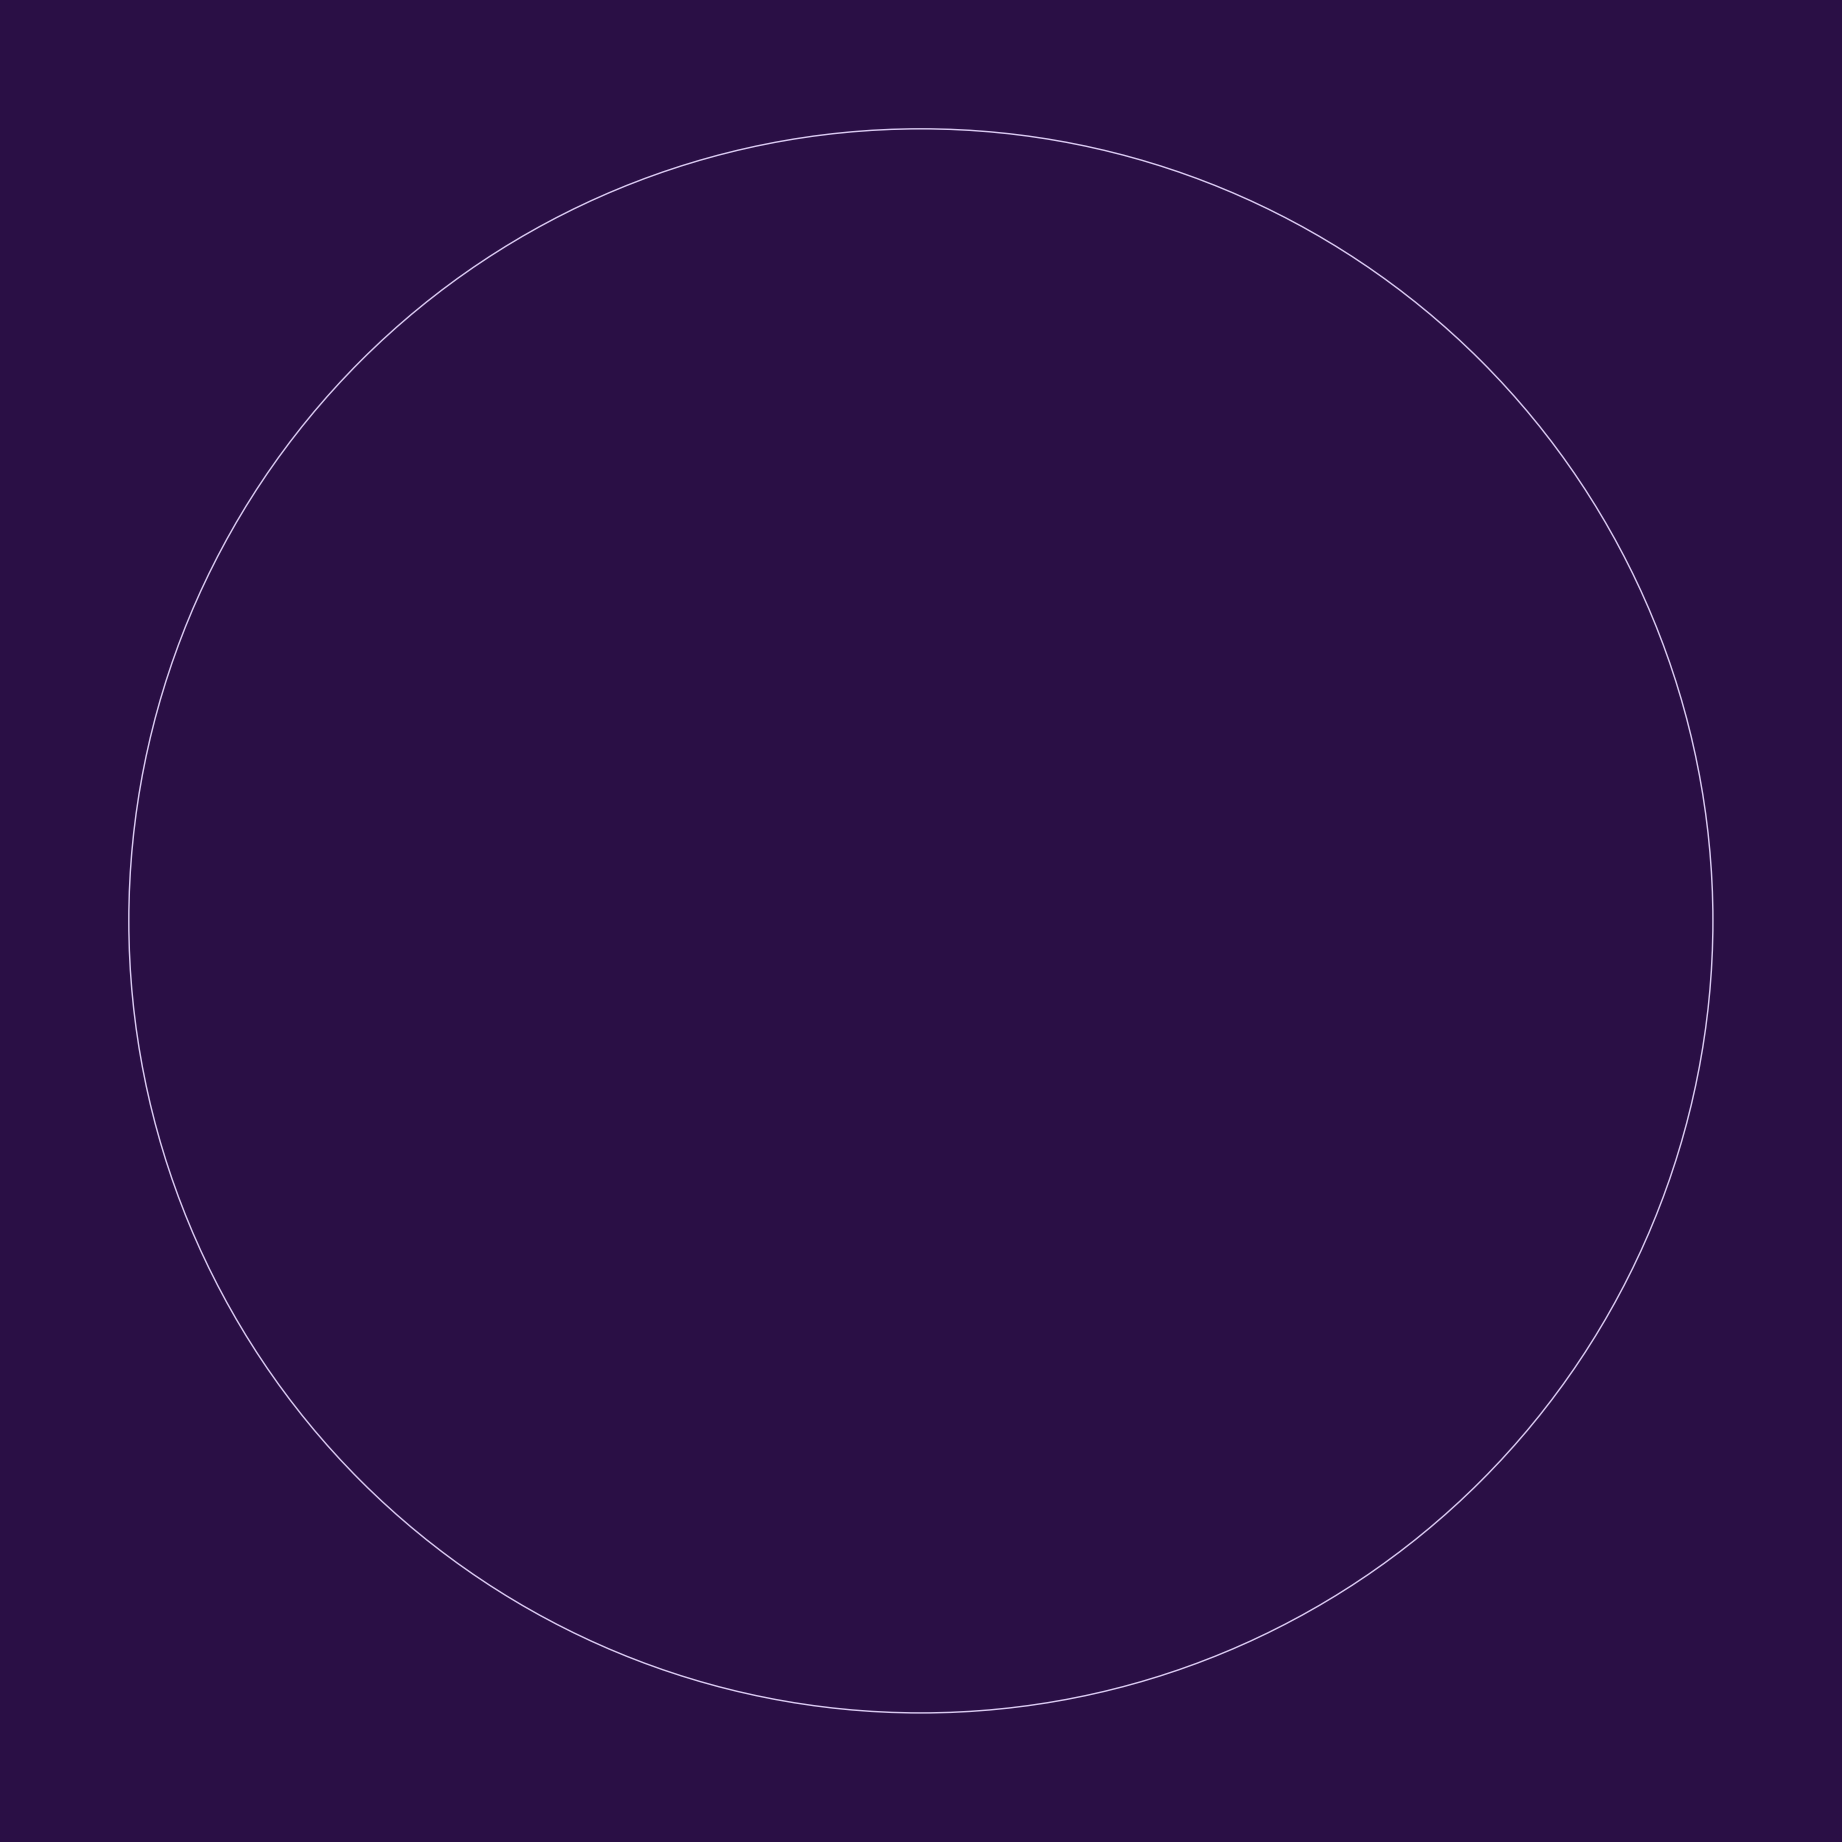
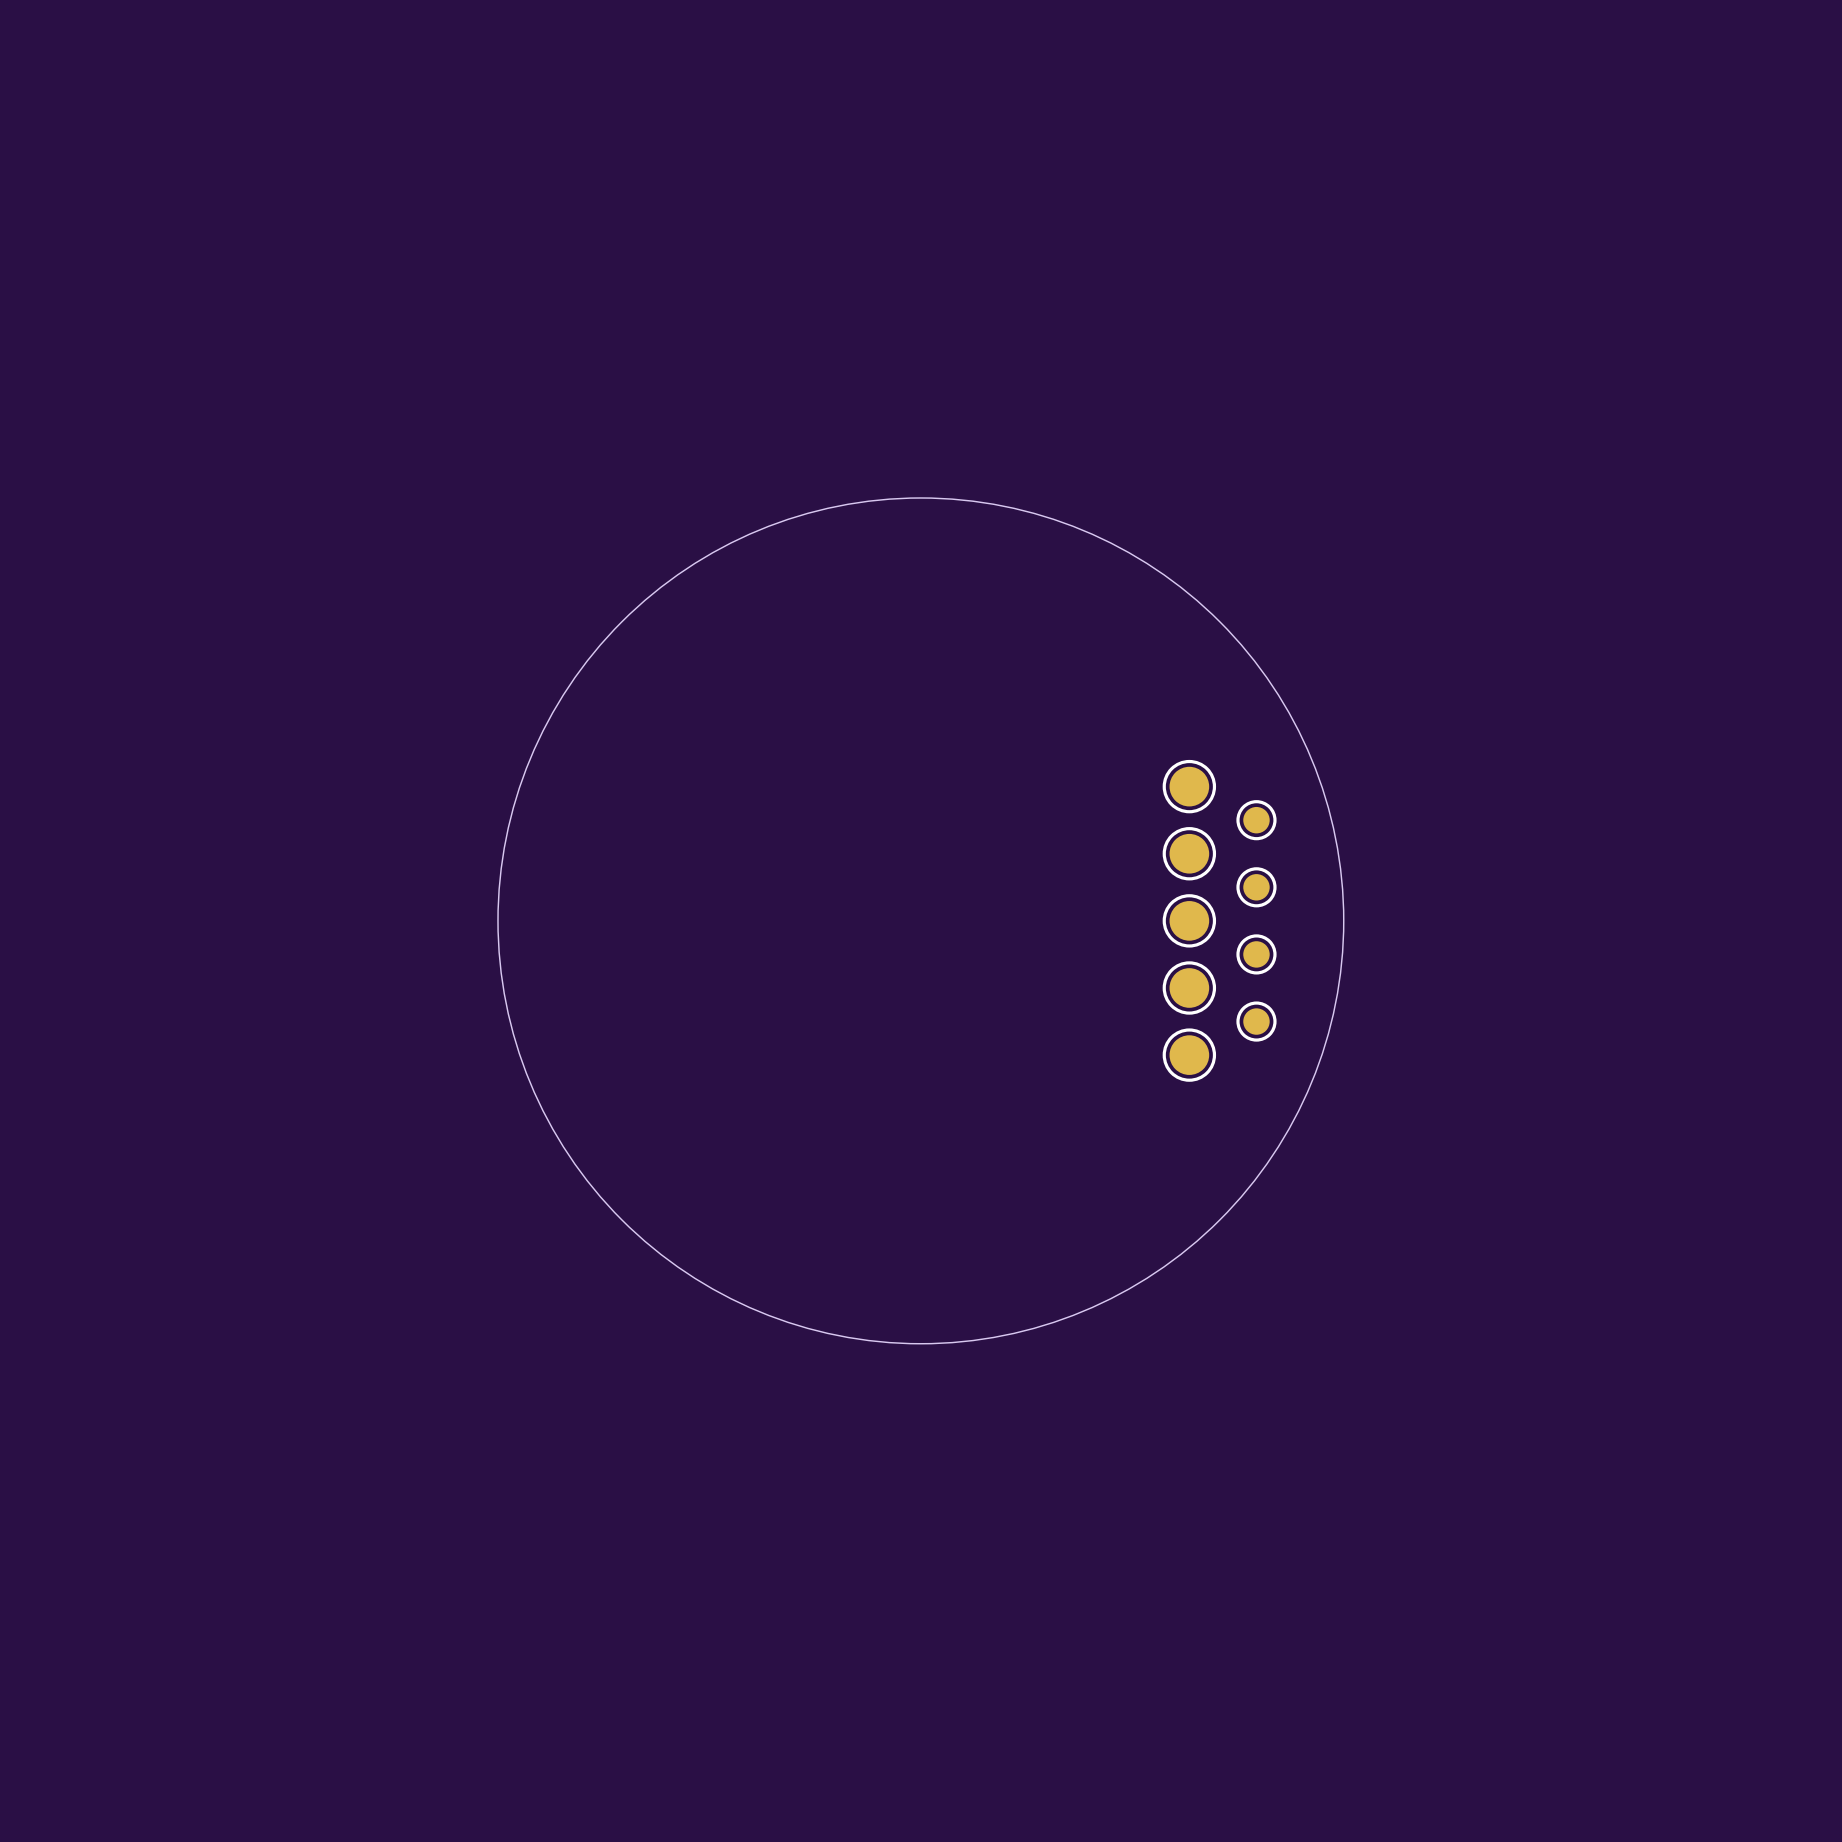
round board edge size: [128, 128, 1714, 1714] -> [497, 497, 1345, 1345]
part: none -> (1189, 786)
part: none -> (1256, 820)
part: none -> (1189, 853)
part: none -> (1256, 887)
part: none -> (1189, 920)
part: none -> (1256, 954)
part: none -> (1189, 987)
part: none -> (1256, 1021)
part: none -> (1189, 1055)

